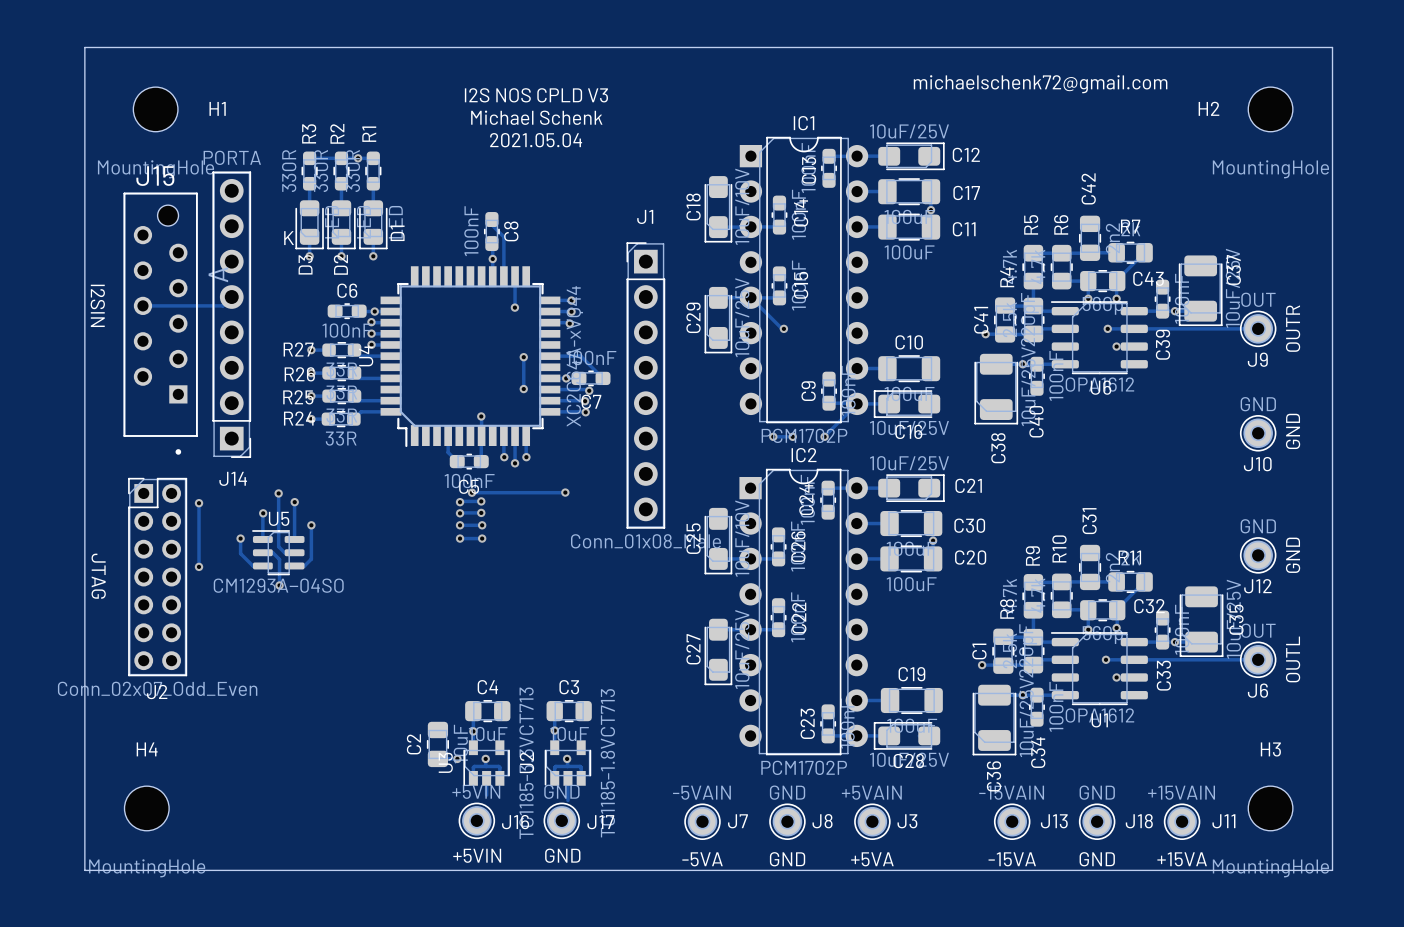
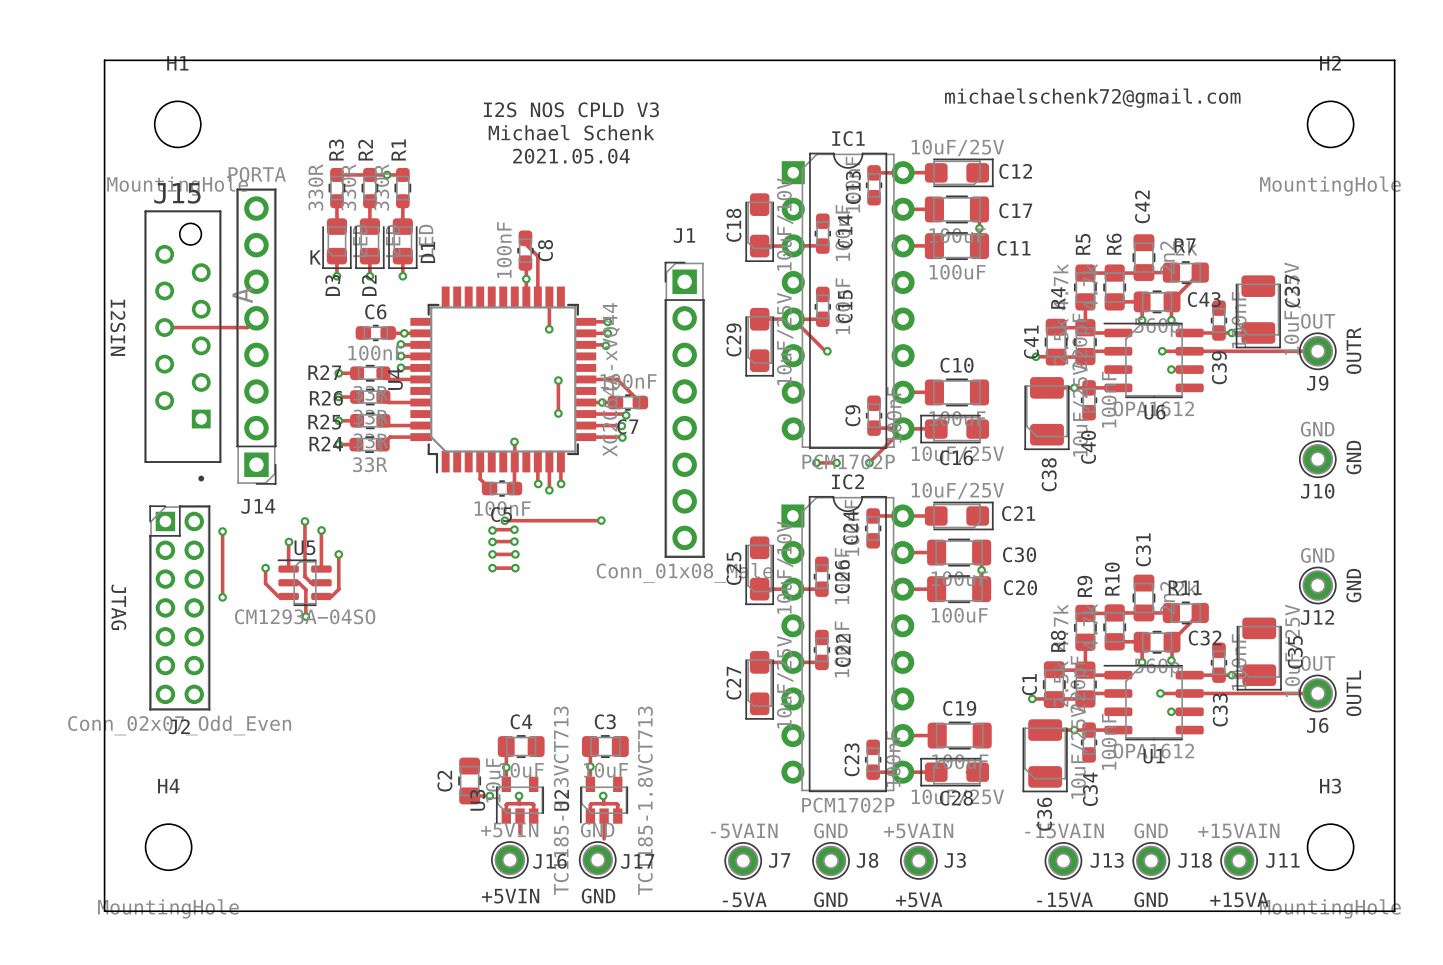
H1 name position: H1 (217, 108) -> H1 (177, 63)
H2 name position: H2 (1208, 108) -> H2 (1330, 63)

